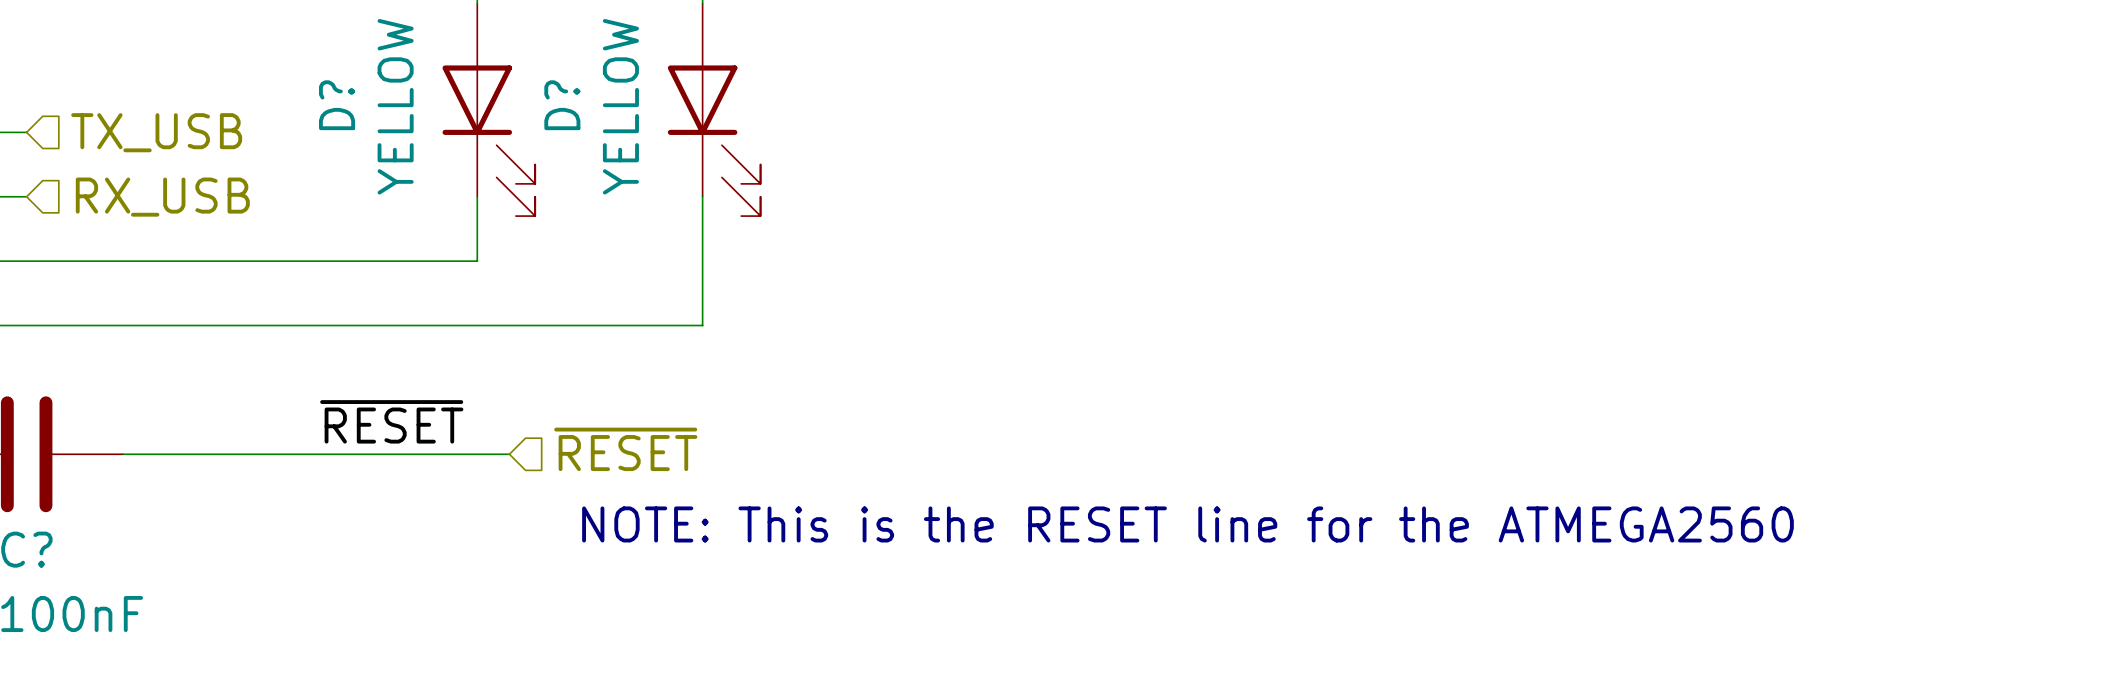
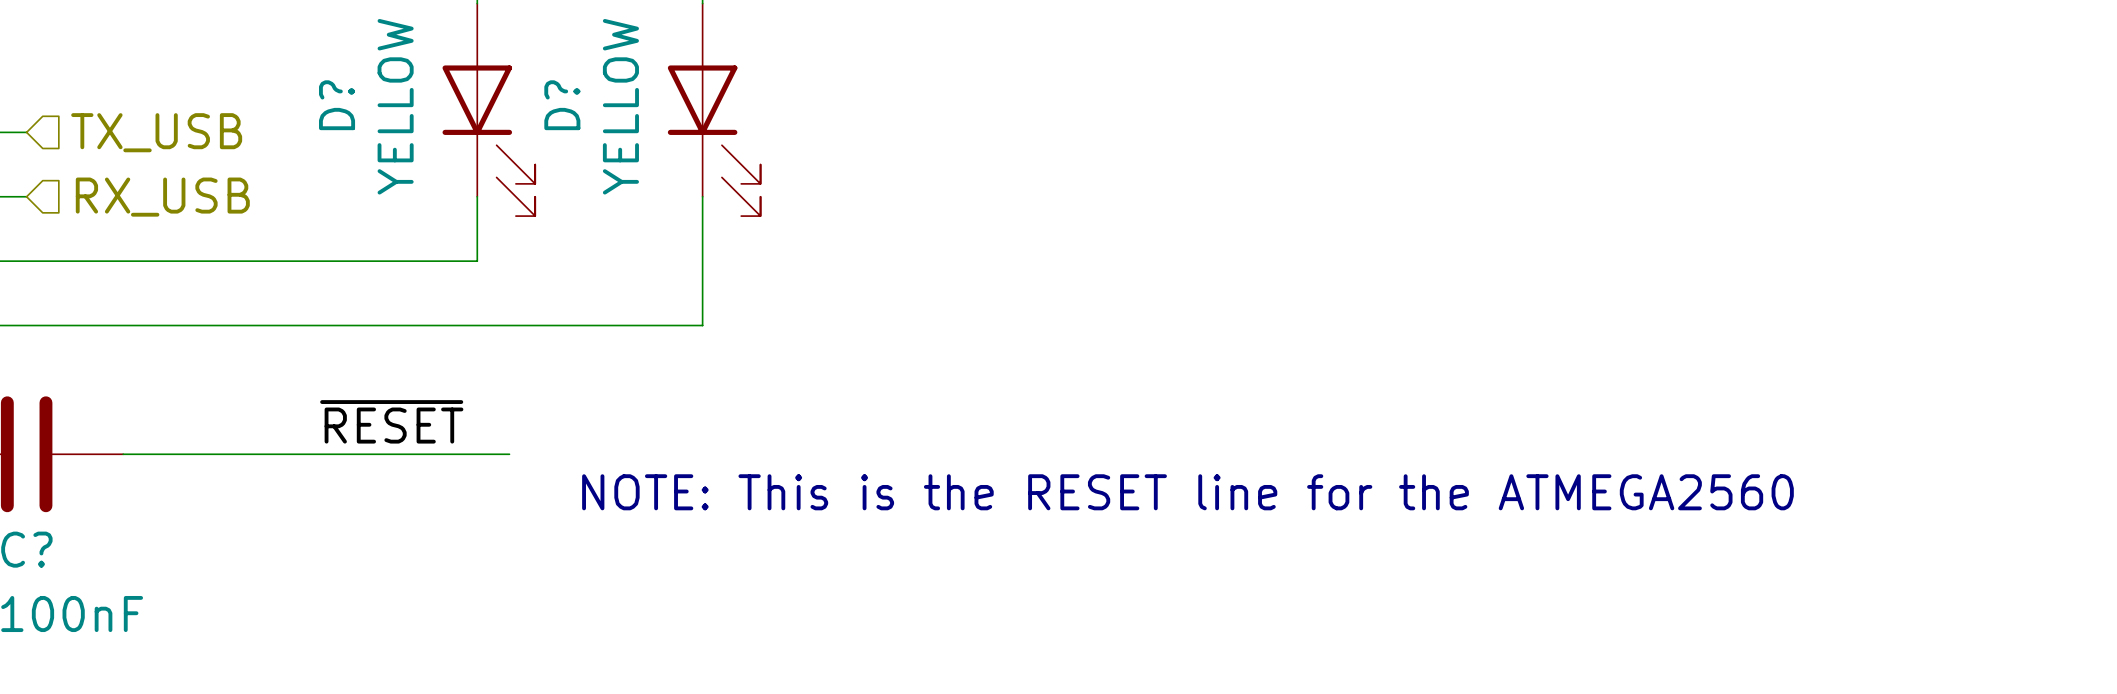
hierarchical label: ~{RESET} (625, 449) -> none
text position: NOTE: This is the RESET line for the ATMEGA2560 (1187, 524) -> NOTE: This is the RESET line for the ATMEGA2560 (1187, 492)

